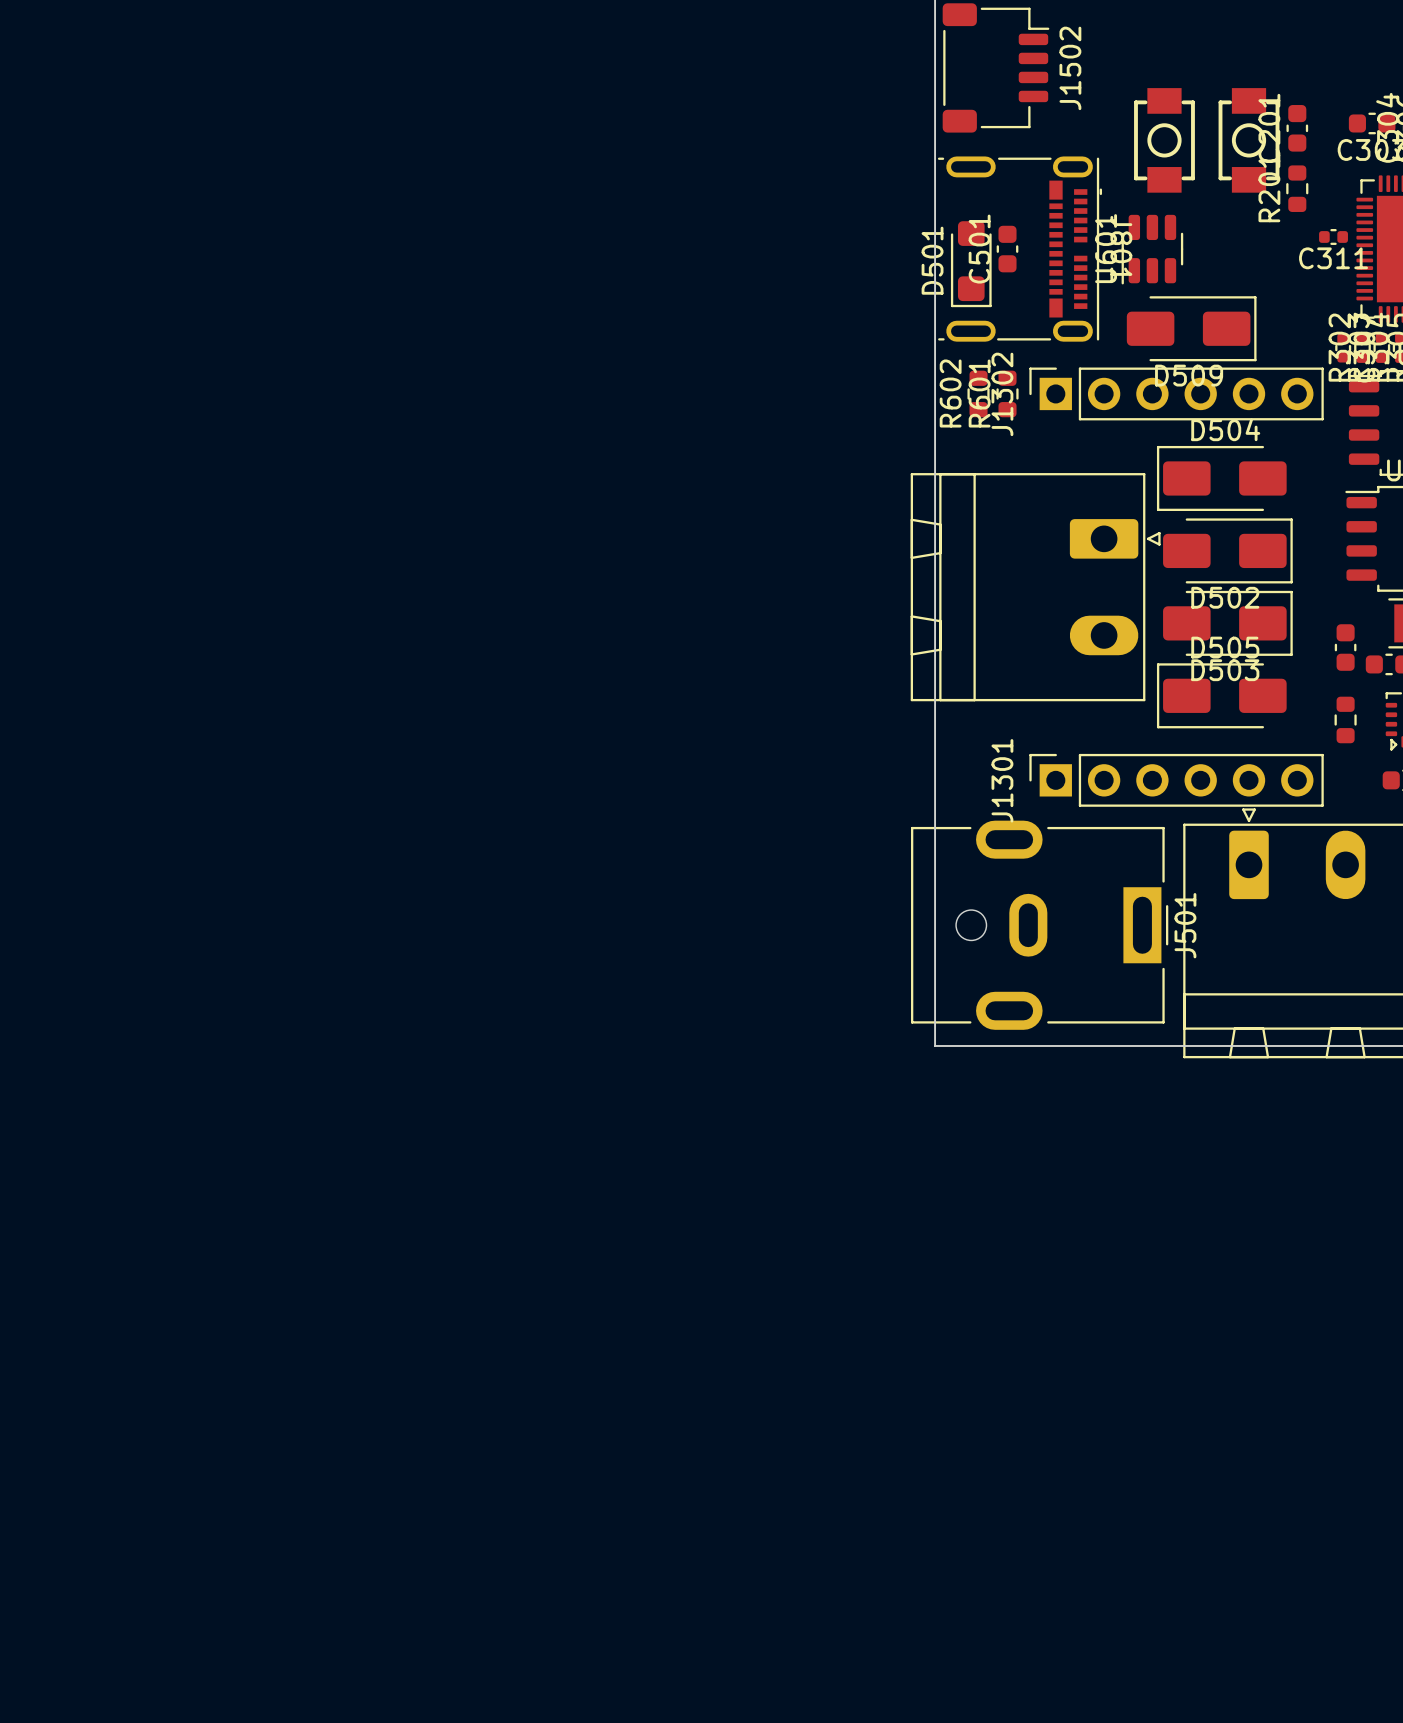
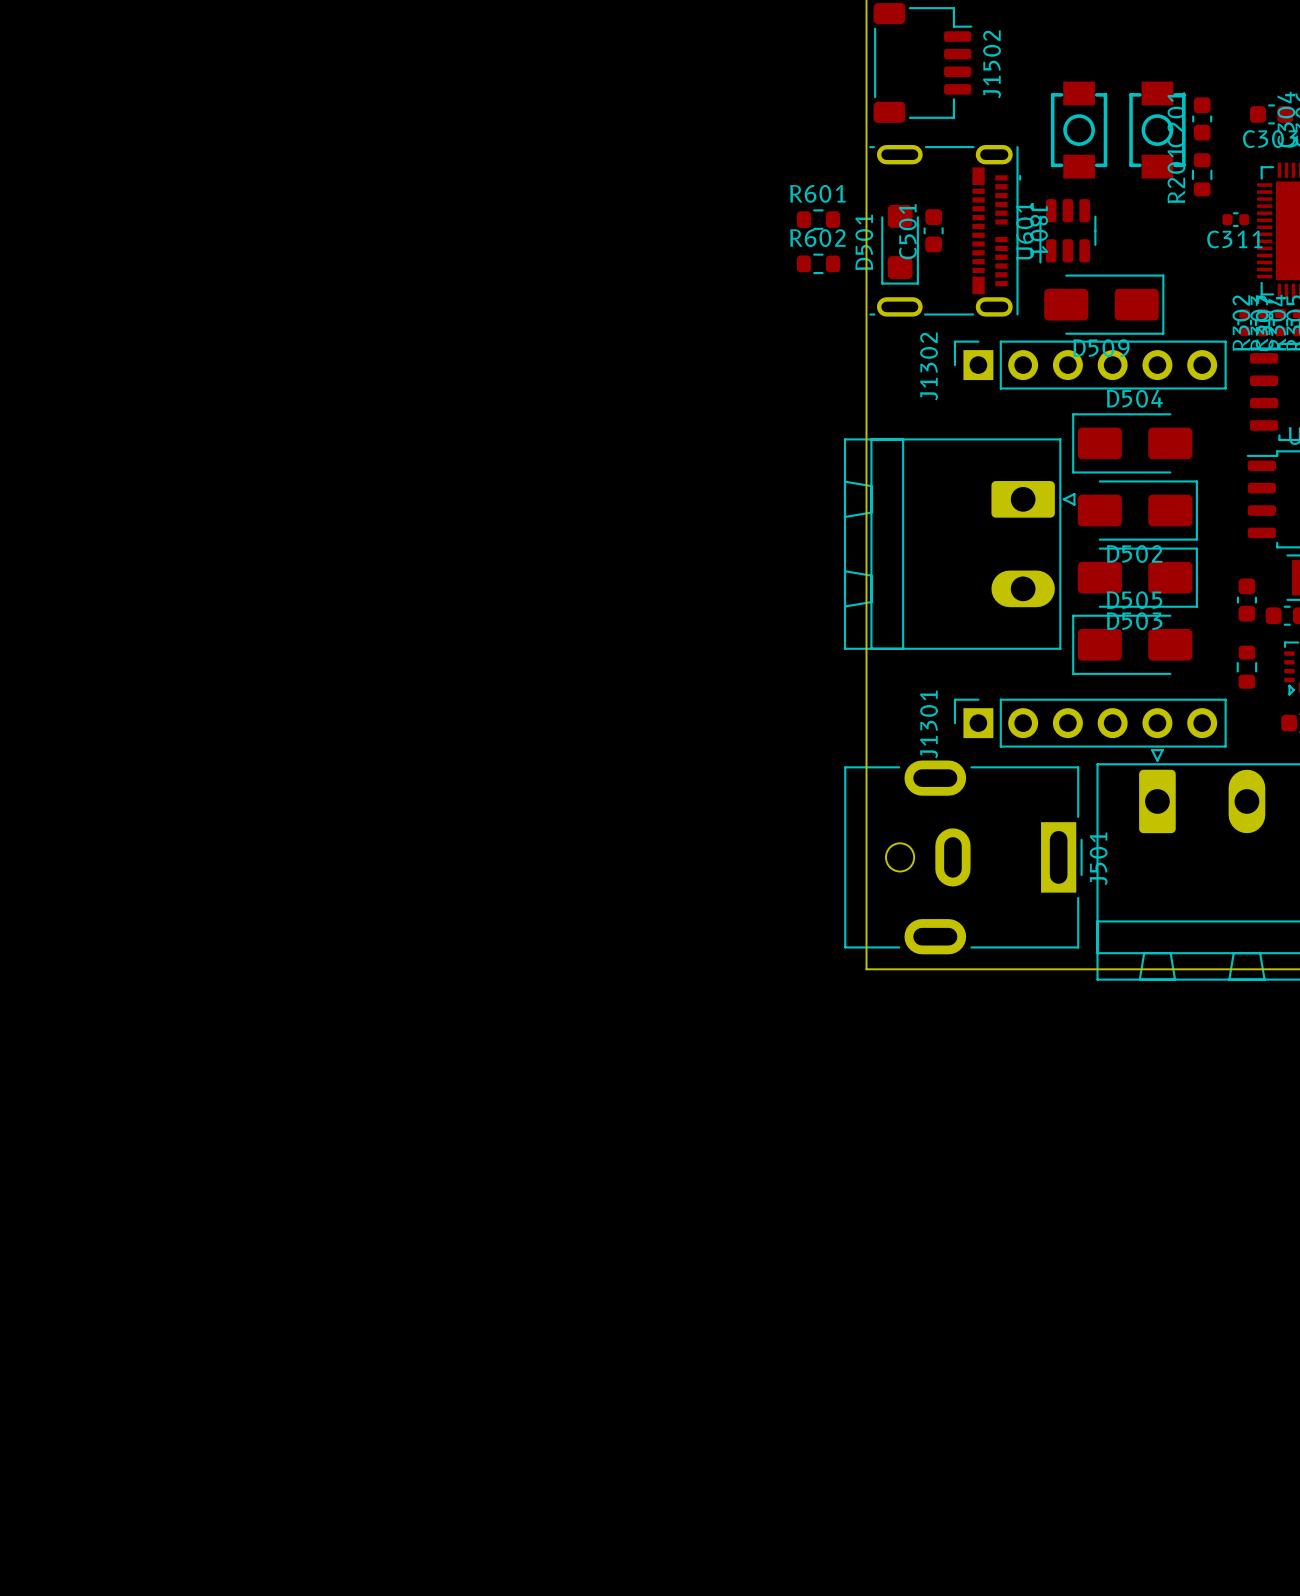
R602 rotation: 0° (978, 393) -> 90° clockwise (818, 263)
R602 position: (978, 393) -> (818, 263)
R601 rotation: 0° (1007, 393) -> 90° clockwise (818, 219)
R601 position: (1007, 393) -> (818, 219)

